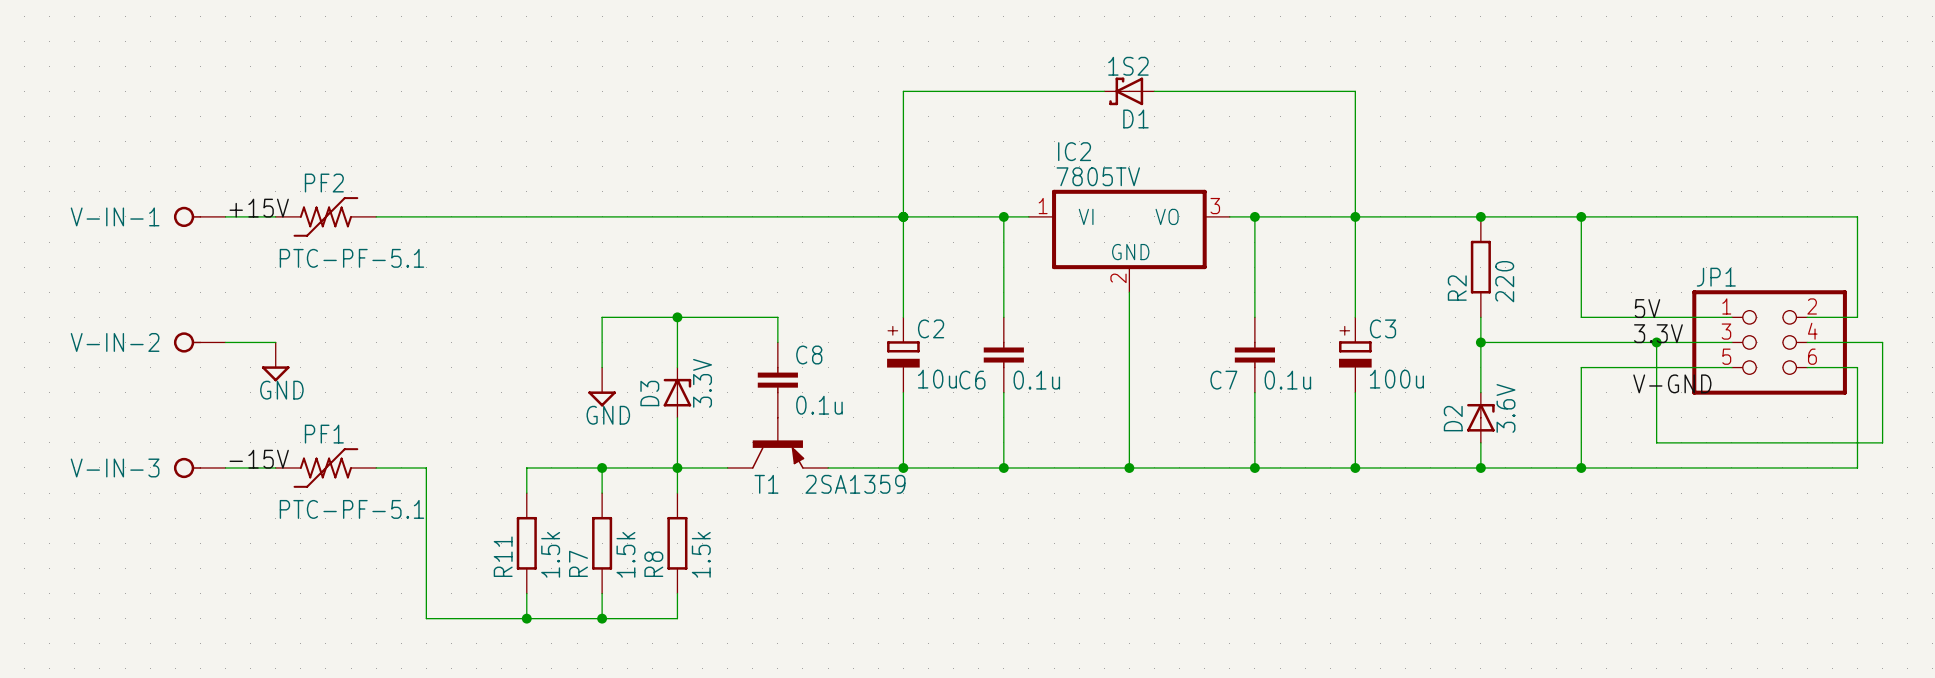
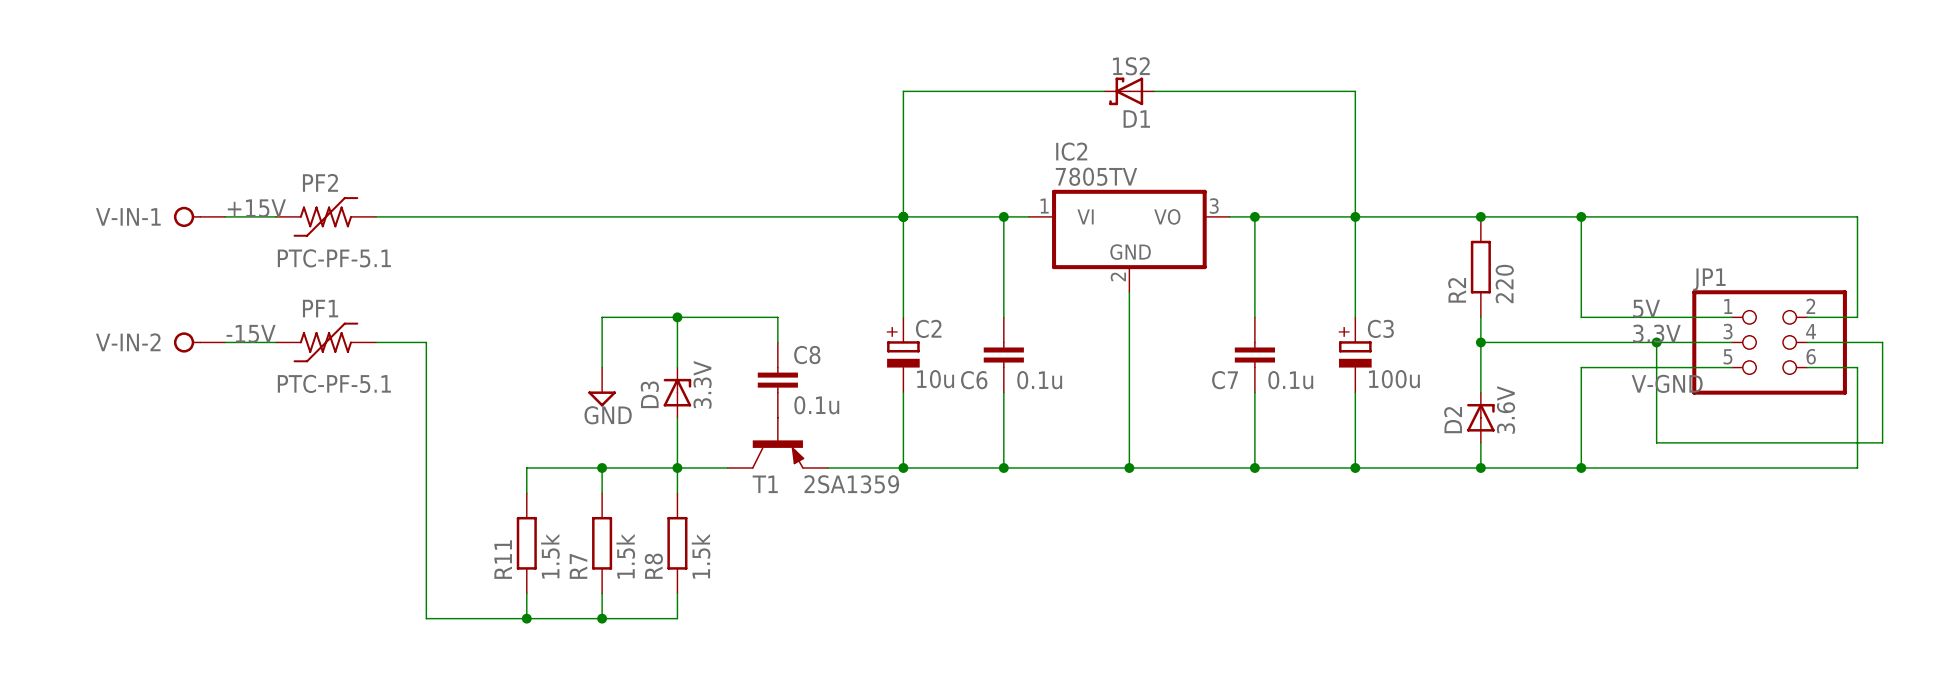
power symbol: GND (275, 361) -> none
label position: -15V (259, 459) -> -15V (251, 333)
V-IN-3: (199, 467) -> none
wire: (225, 467) (275, 467) -> none
PF1 position: (325, 467) -> (325, 342)
wire: (376, 467) (426, 467) -> (376, 342) (426, 342) (426, 467)

